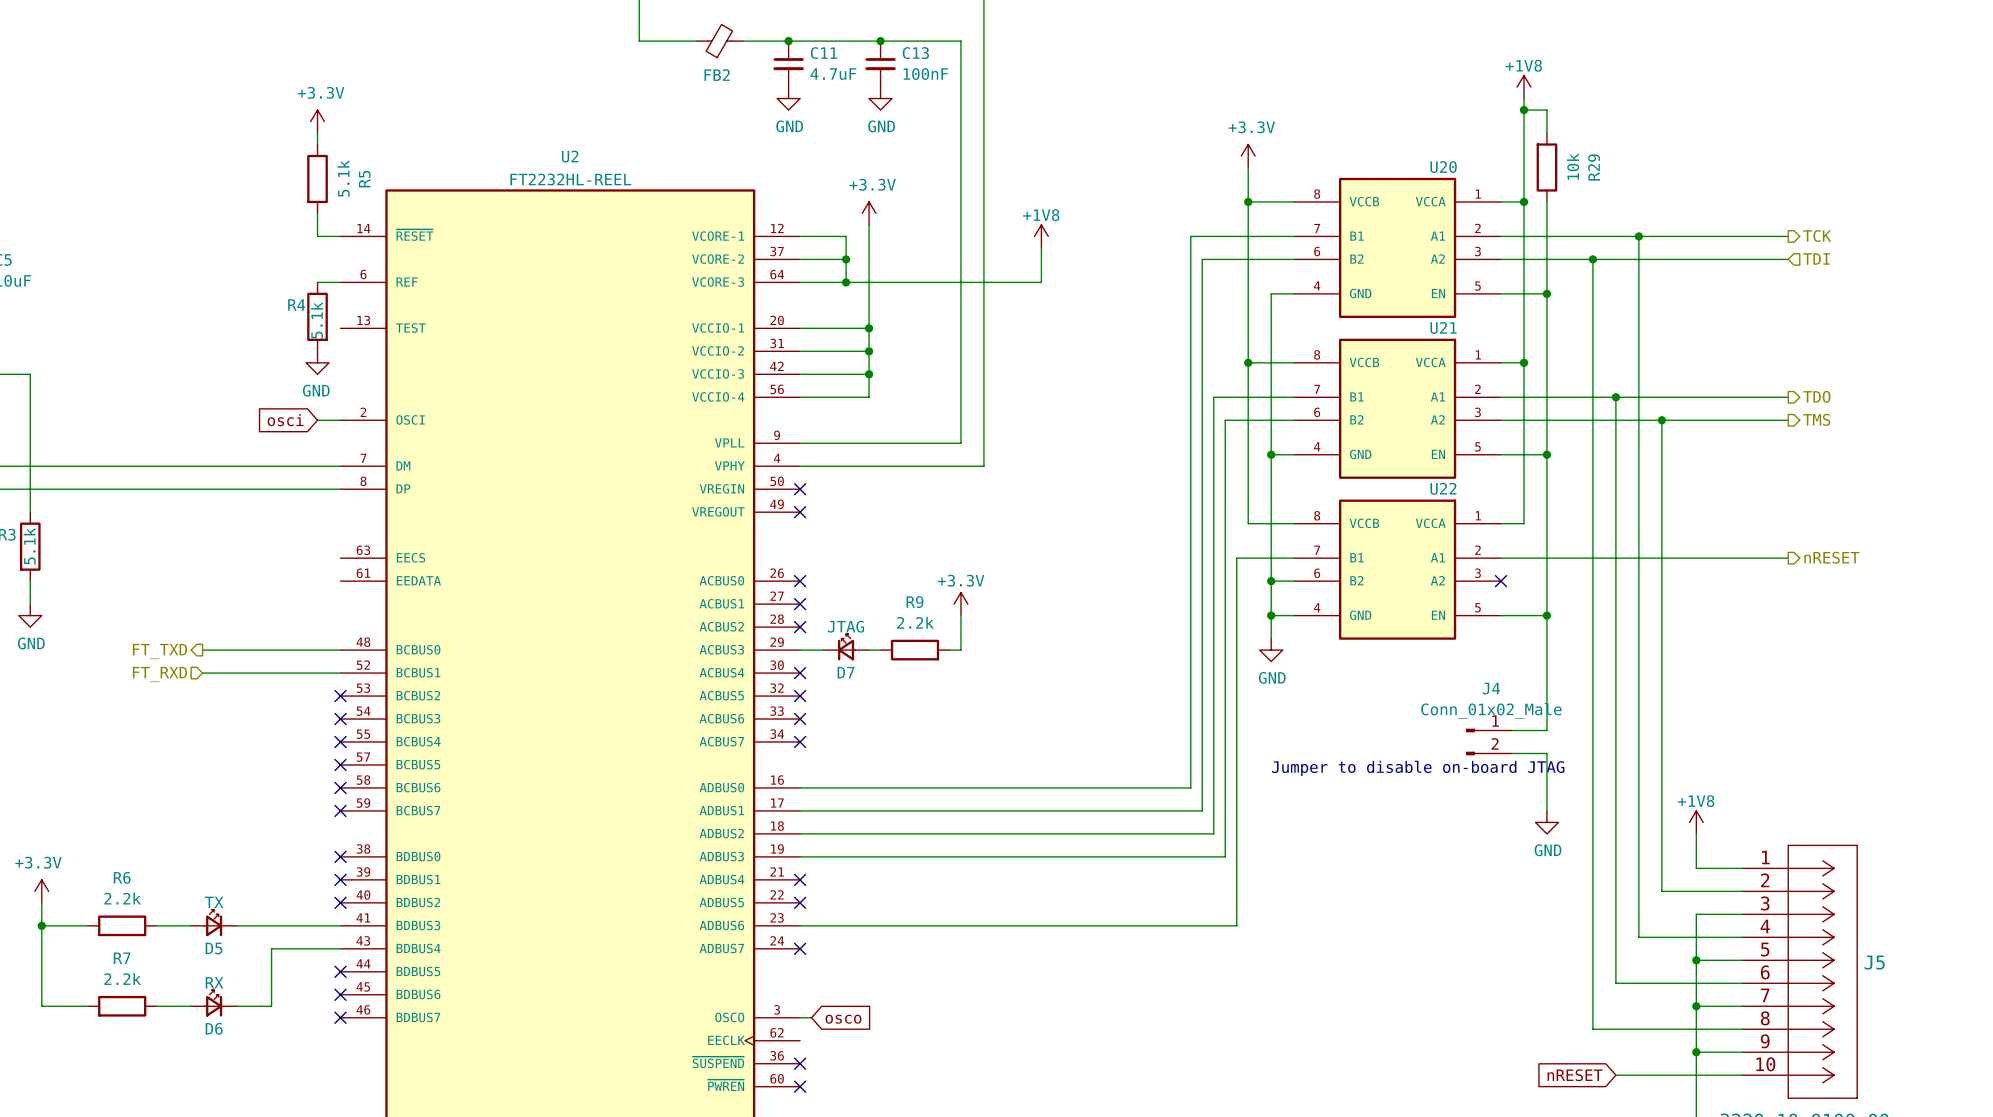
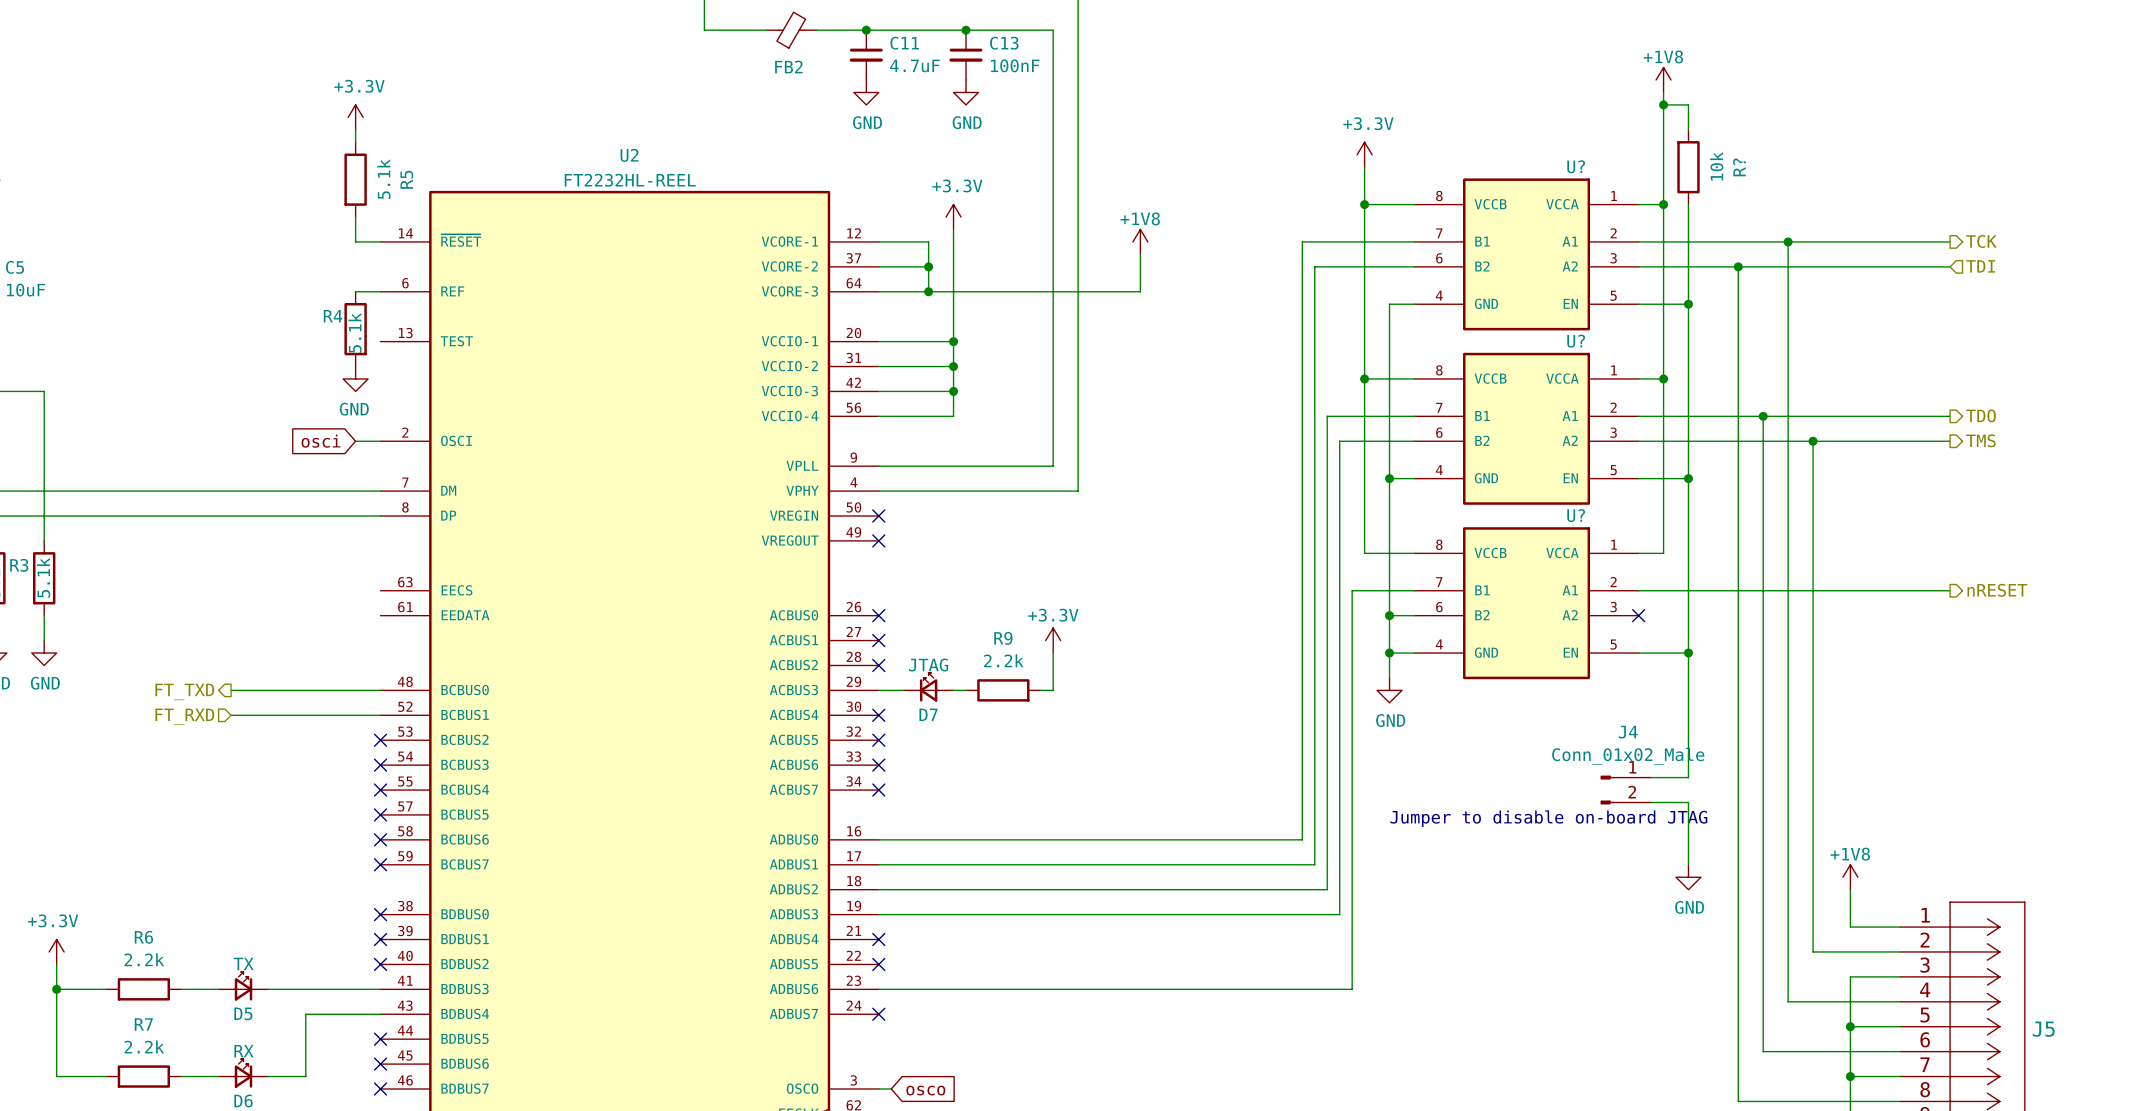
U20 name: U20 (1443, 167) -> U? (1576, 166)
R29 name: R29 (1594, 167) -> R? (1739, 167)
U21 name: U21 (1443, 327) -> U? (1576, 341)
U22 name: U22 (1443, 488) -> U? (1576, 515)

